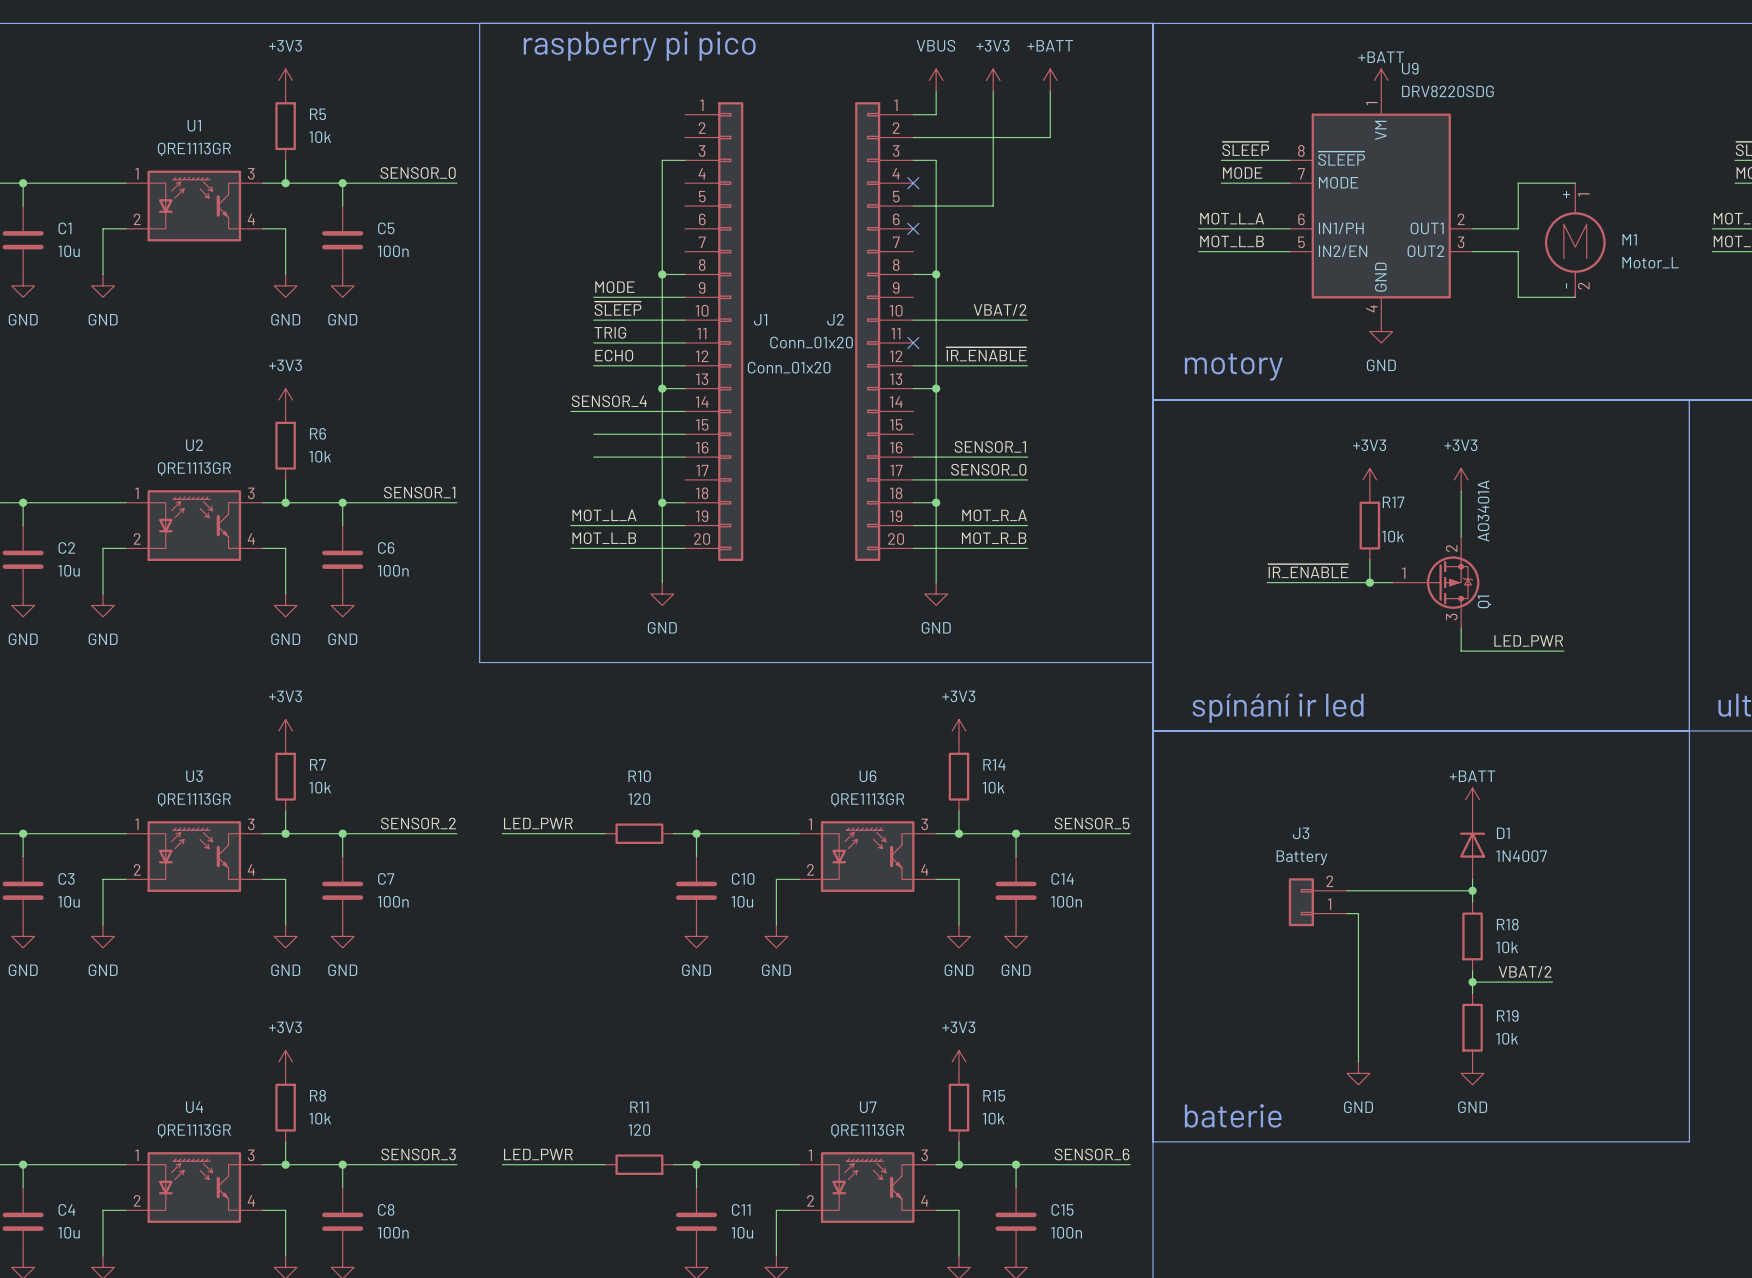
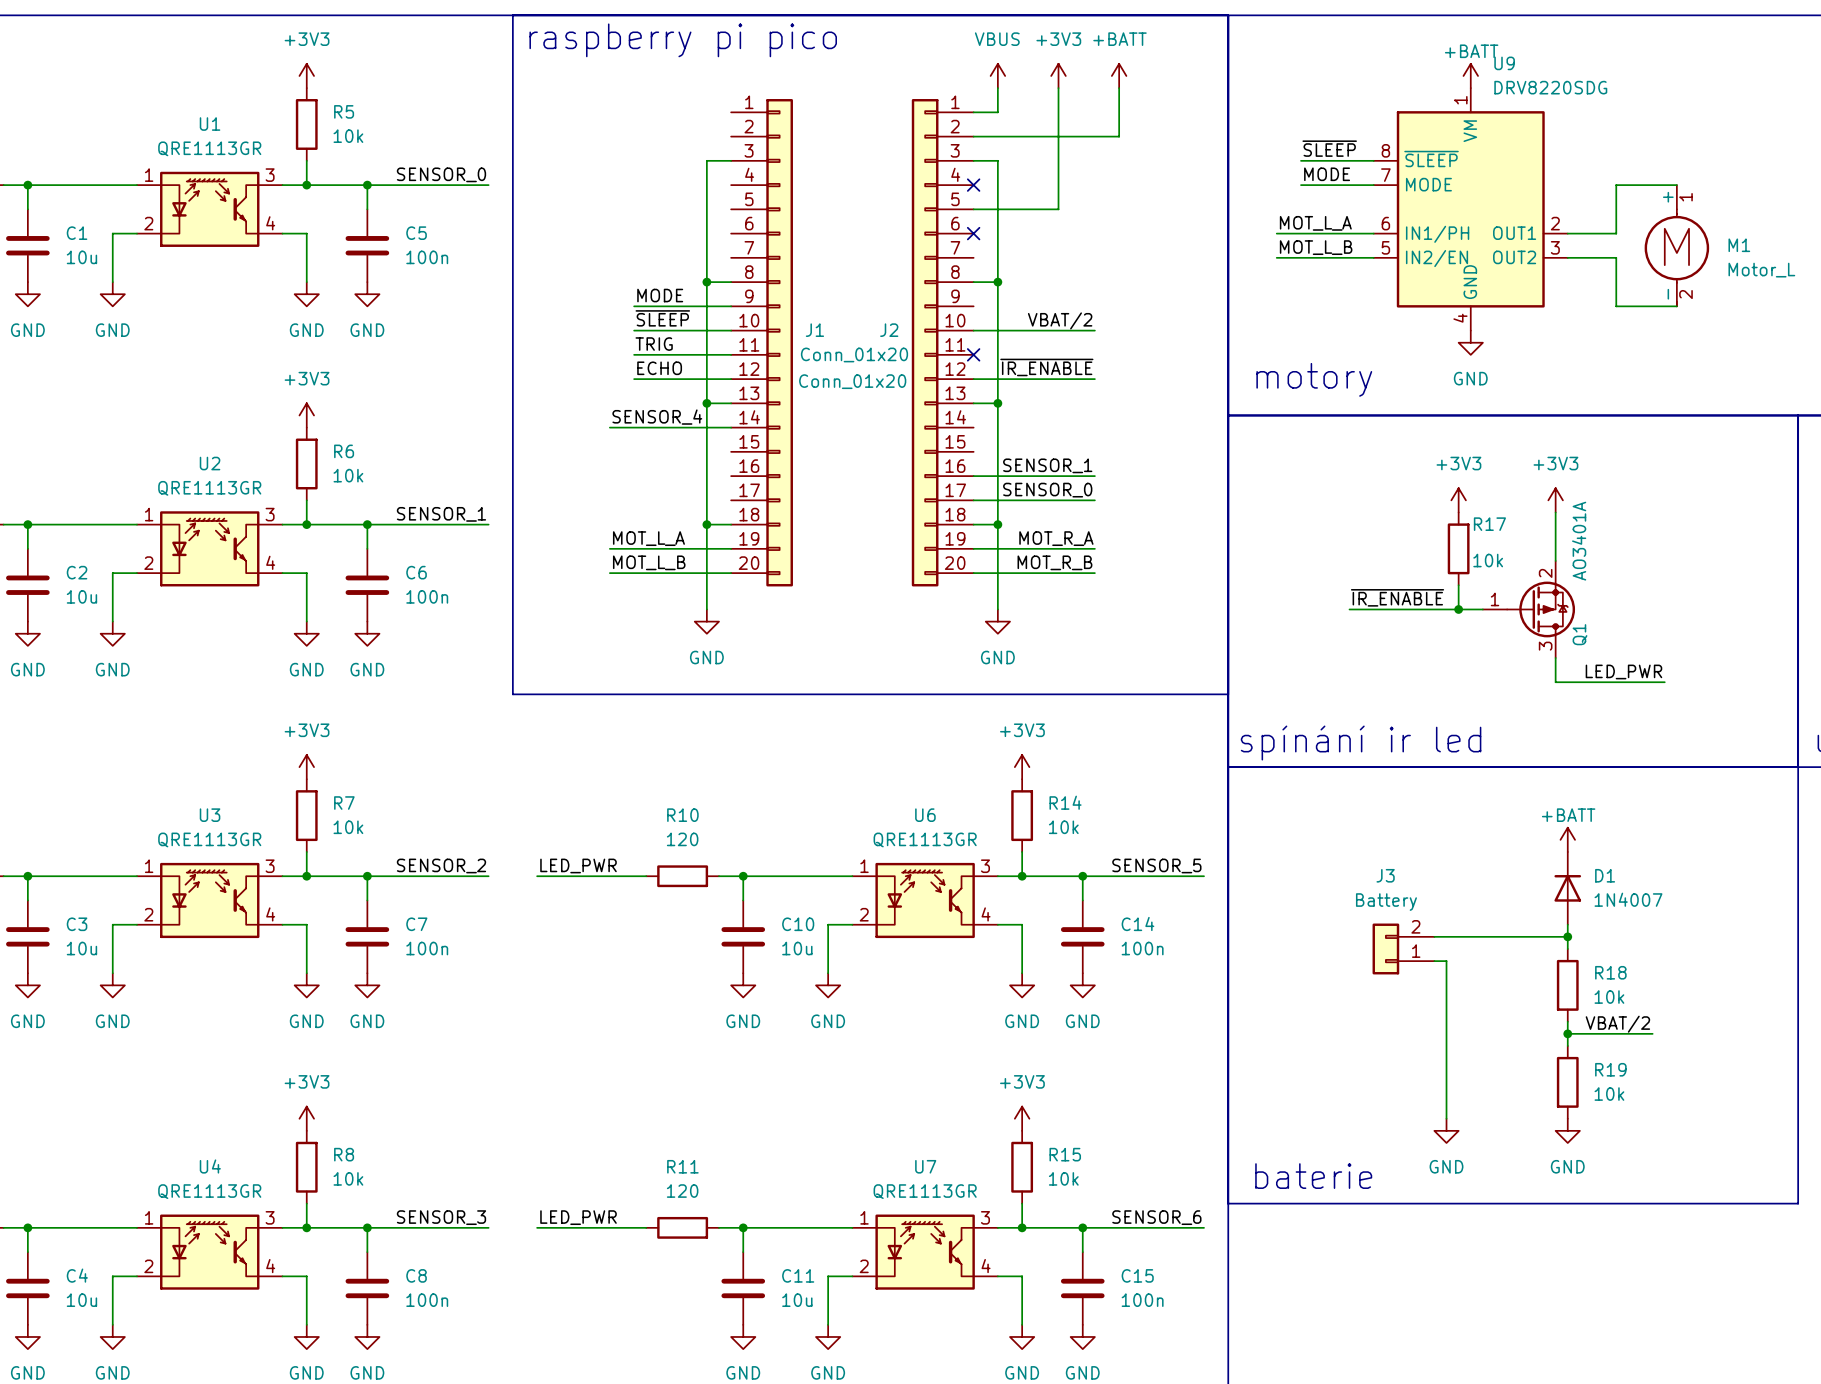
wire: (593, 434) (685, 434) -> none
wire: (593, 457) (685, 457) -> none

